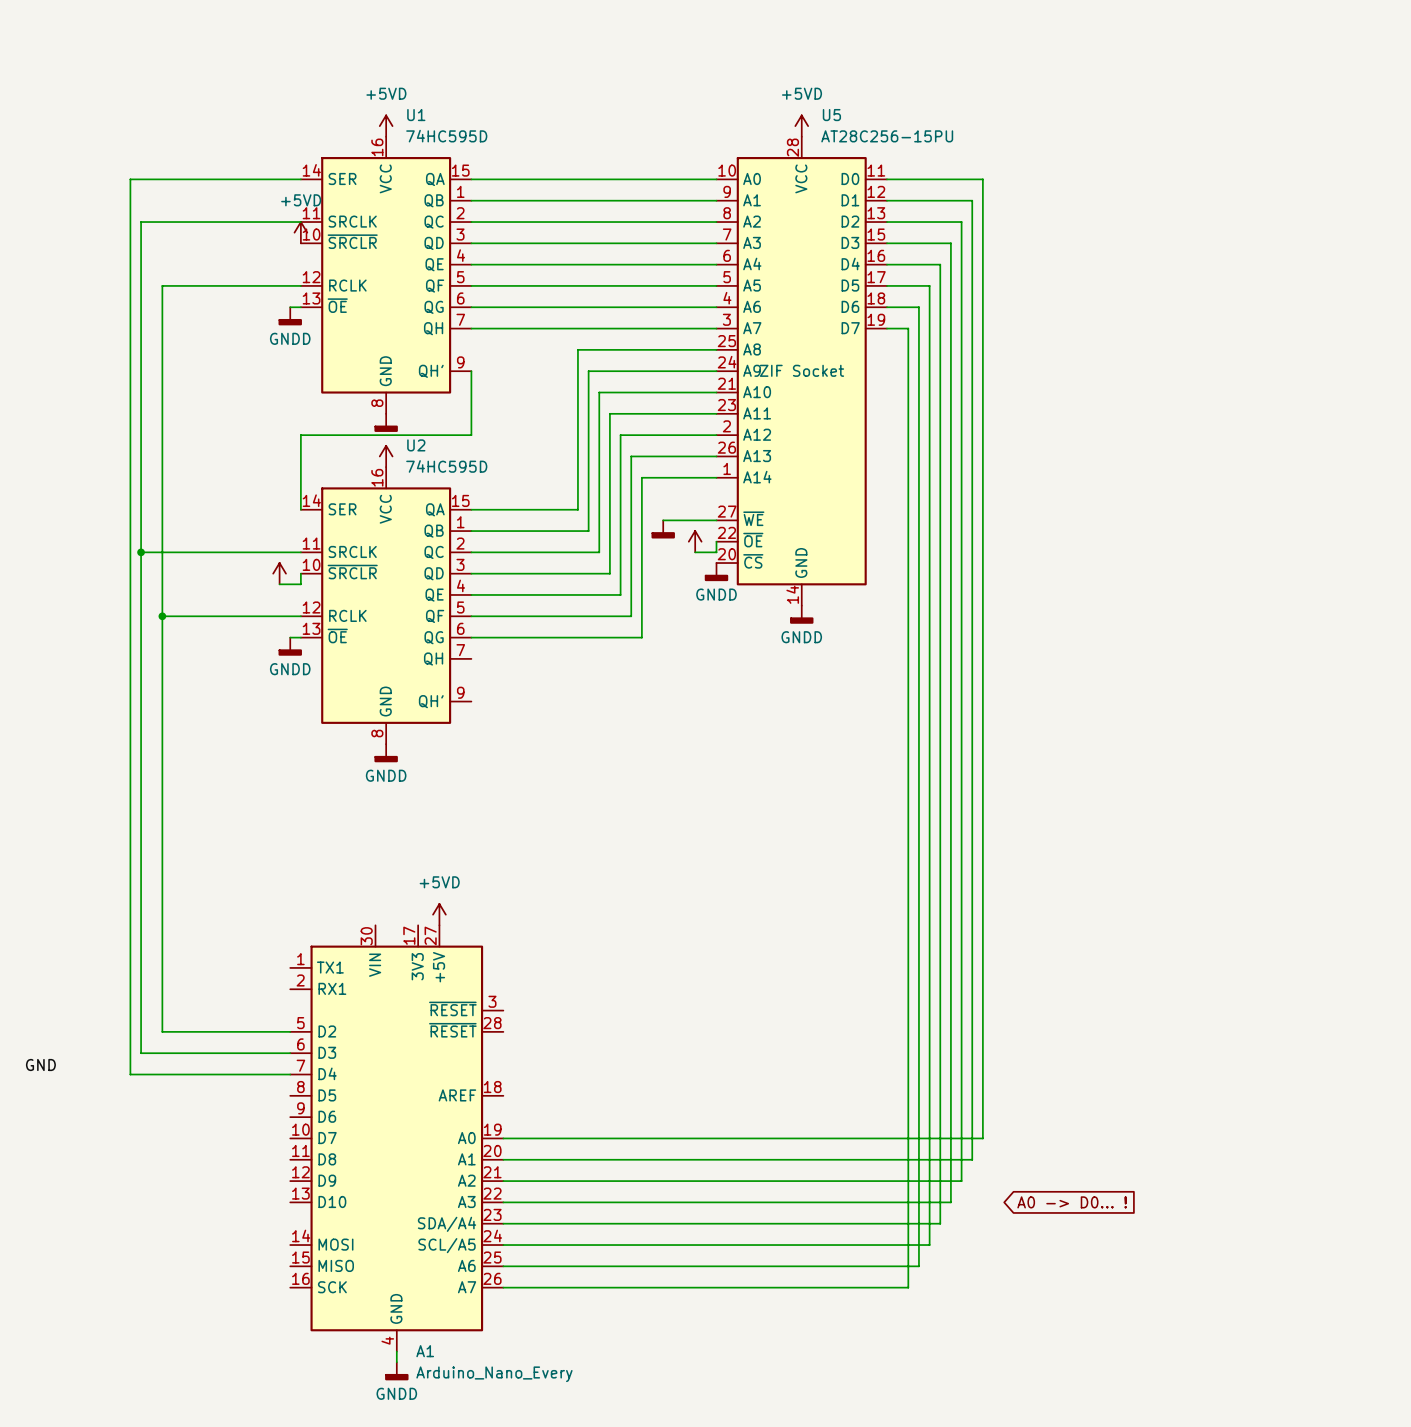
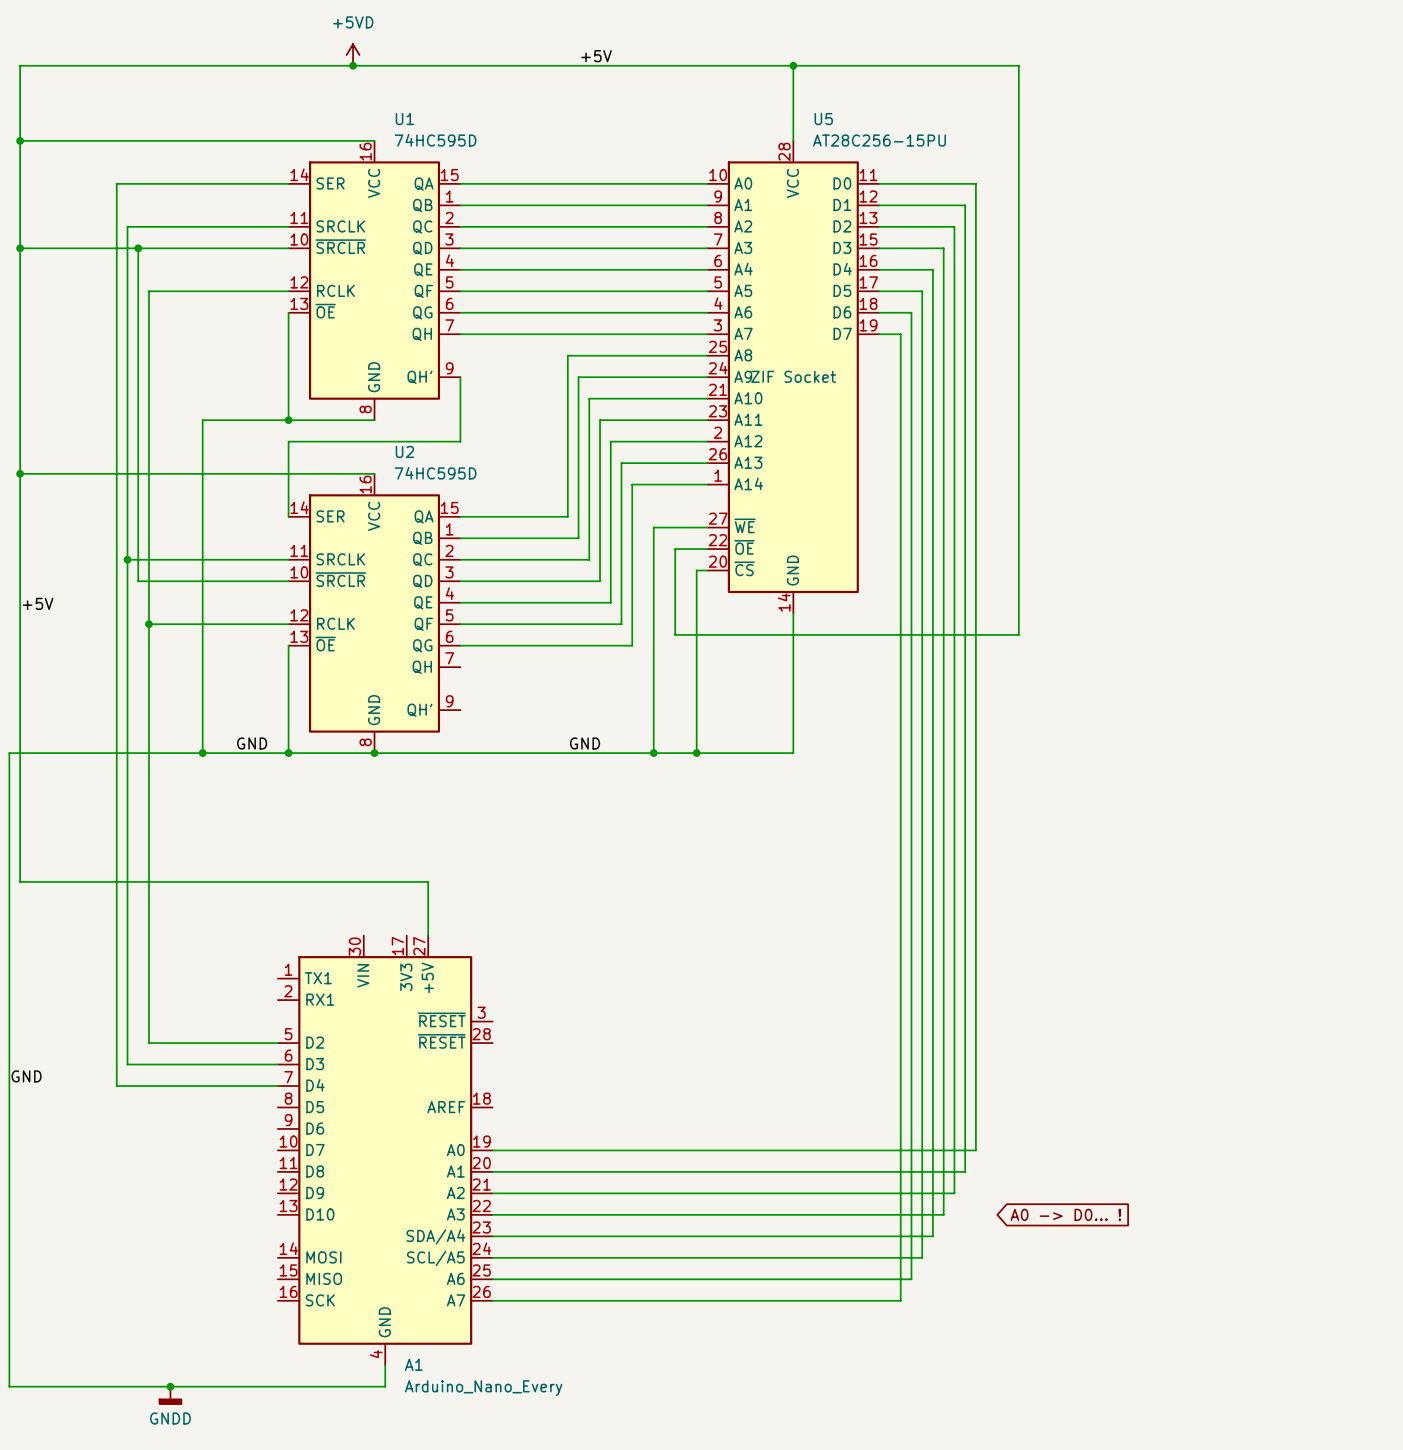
label: none -> +5V (596, 56)
junction: none -> (353, 65)
wire: none -> (793, 65) (793, 140)
junction: none -> (793, 65)
power symbol position: +5VD (386, 126) -> +5VD (353, 55)
power symbol: +5VD (801, 126) -> none
wire: none -> (20, 140) (374, 140)
junction: none -> (20, 140)
power symbol: +5VD (300, 232) -> none
wire: none -> (20, 248) (288, 248)
junction: none -> (20, 248)
junction: none -> (138, 248)
wire: (290, 307) (300, 307) -> (288, 420) (288, 312)
power symbol: GNDD (290, 316) -> none
junction: none -> (288, 420)
wire: none -> (374, 420) (202, 420) (202, 753)
power symbol: (386, 422) -> none
power symbol: (386, 456) -> none
wire: none -> (20, 473) (374, 473)
junction: none -> (20, 473)
wire: none -> (653, 527) (653, 753)
power symbol: (663, 529) -> none
power symbol: (695, 541) -> none
wire: (716, 541) (716, 552) (695, 552) -> (707, 549) (675, 549) (675, 634) (1018, 634) (1018, 65) (20, 65) (20, 881) (428, 881) (428, 935)
wire: none -> (707, 570) (696, 570) (696, 753)
power symbol: GNDD (716, 572) -> none
power symbol: (279, 573) -> none
wire: (300, 573) (300, 584) (279, 584) -> (288, 581) (138, 581) (138, 248)
label: none -> +5V (38, 603)
wire: none -> (793, 613) (793, 753) (9, 753) (9, 1386) (385, 1386) (385, 1375)
power symbol: GNDD (801, 614) -> none
wire: (290, 637) (300, 637) -> (288, 753) (288, 645)
power symbol: GNDD (290, 646) -> none
label: none -> GND (252, 743)
label: none -> GND (585, 743)
junction: none -> (202, 753)
junction: none -> (288, 753)
junction: none -> (374, 753)
junction: none -> (653, 753)
junction: none -> (696, 753)
power symbol: GNDD (386, 753) -> none
power symbol: +5VD (439, 914) -> none
power symbol: GNDD (396, 1371) -> none
junction: none -> (170, 1386)
power symbol: none -> GNDD (170, 1395)

